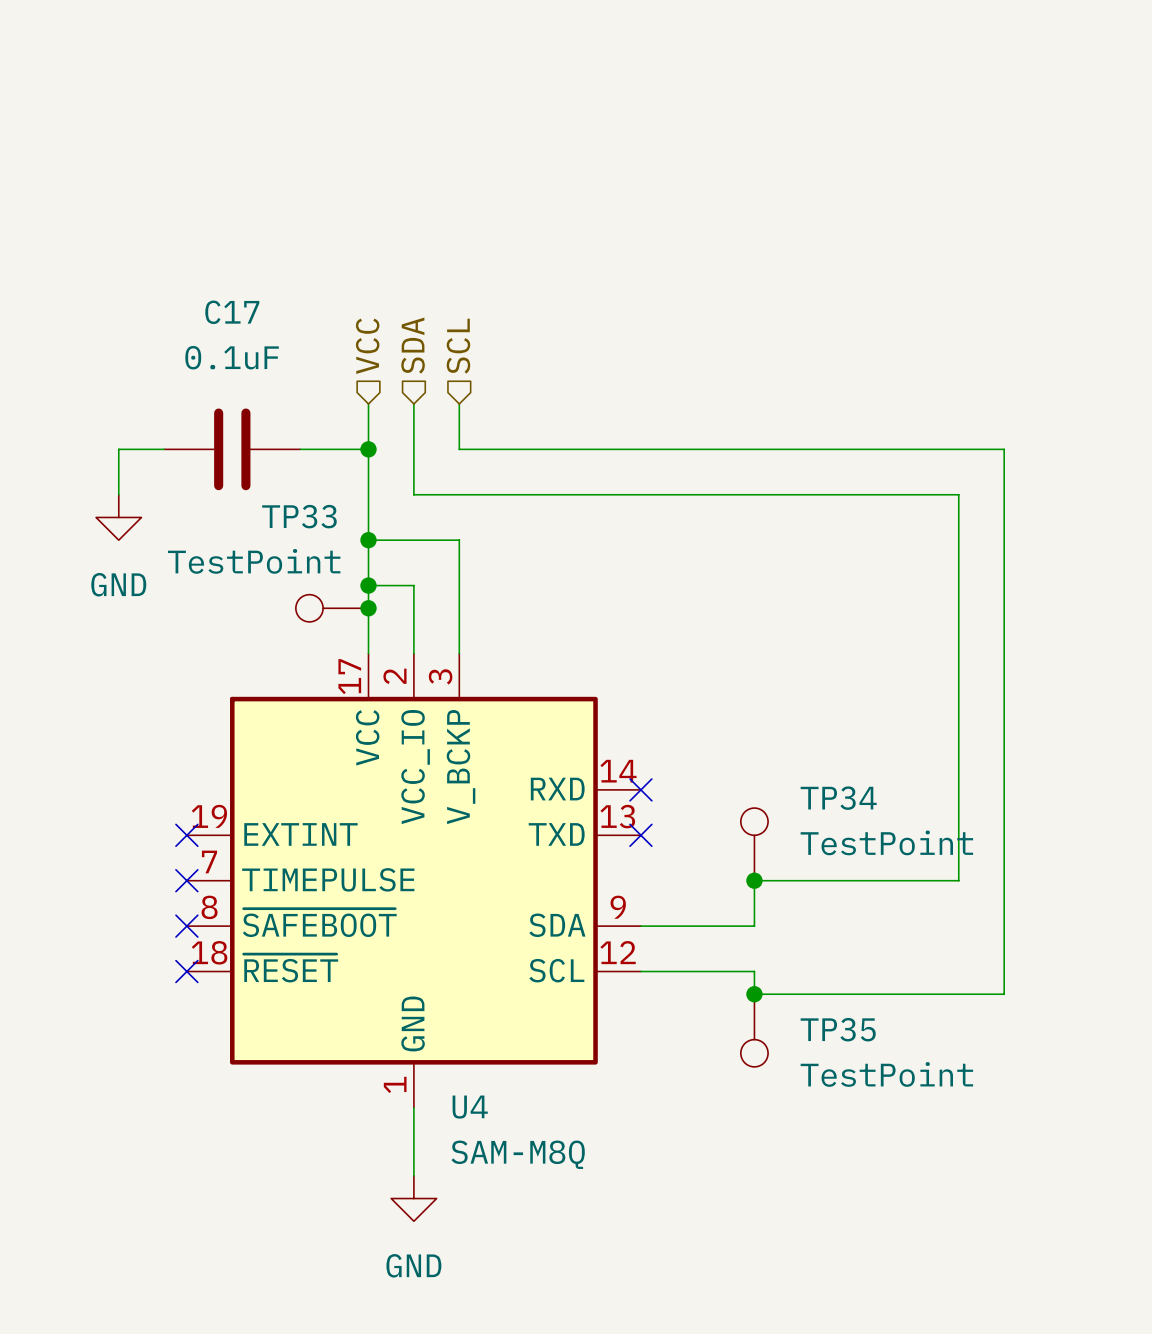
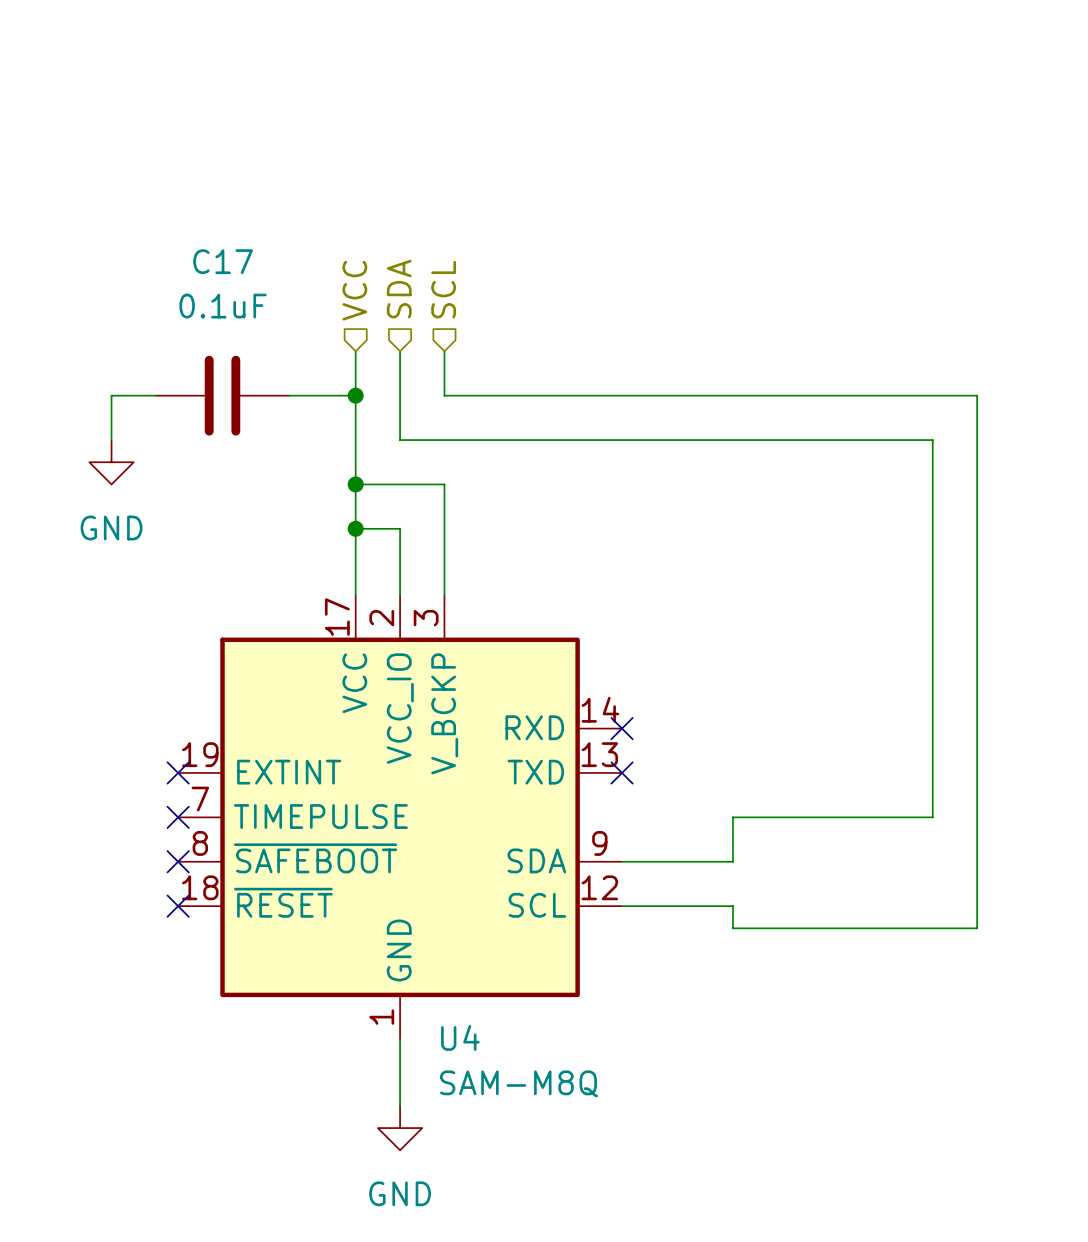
TP33: TestPoint (332, 608) -> none
junction: (368, 608) -> none
TP34: TestPoint (754, 844) -> none
junction: (754, 880) -> none
junction: (754, 994) -> none
TP35: TestPoint (754, 1030) -> none

